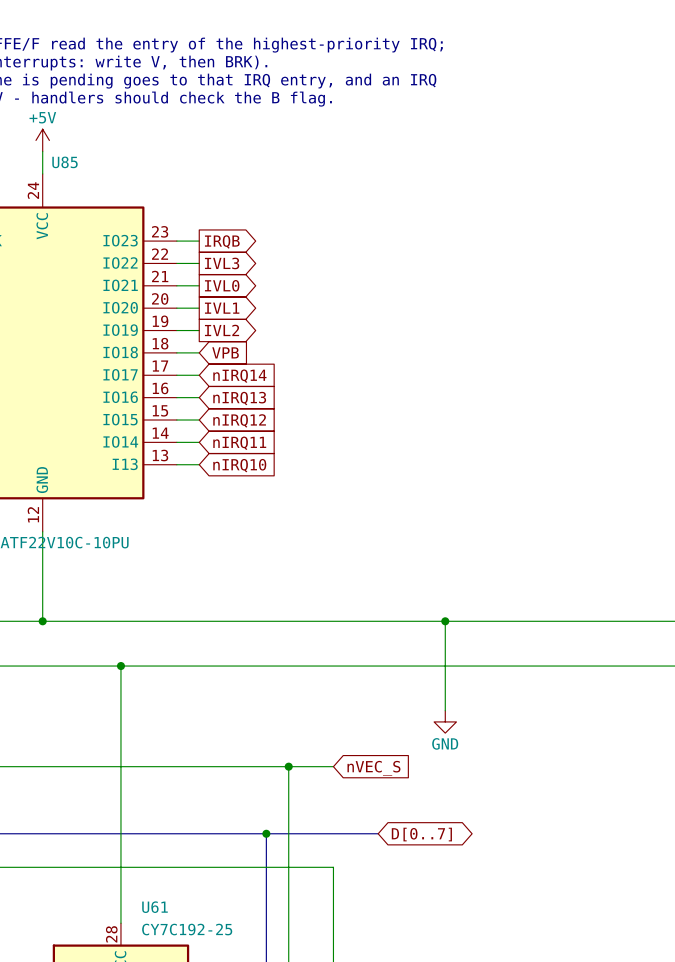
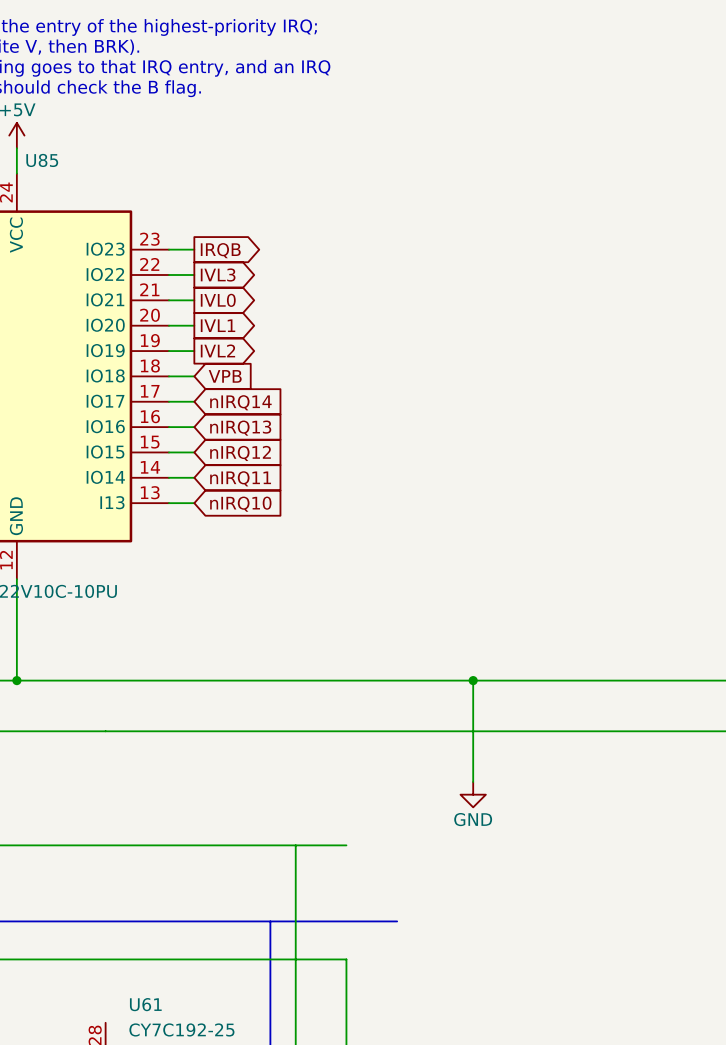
wire: (120, 666) (120, 923) -> none
junction: (120, 666) -> none
junction: (288, 766) -> none
global label: nVEC_S (373, 768) -> none
junction: (266, 833) -> none
global label: D[0..7] (421, 834) -> none

